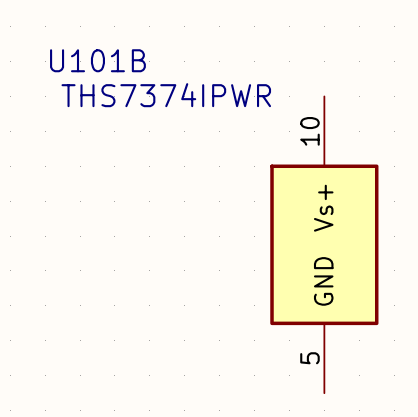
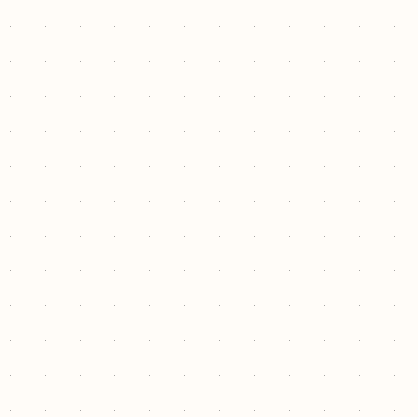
U101B: THS7374IPWR (324, 244) -> none

